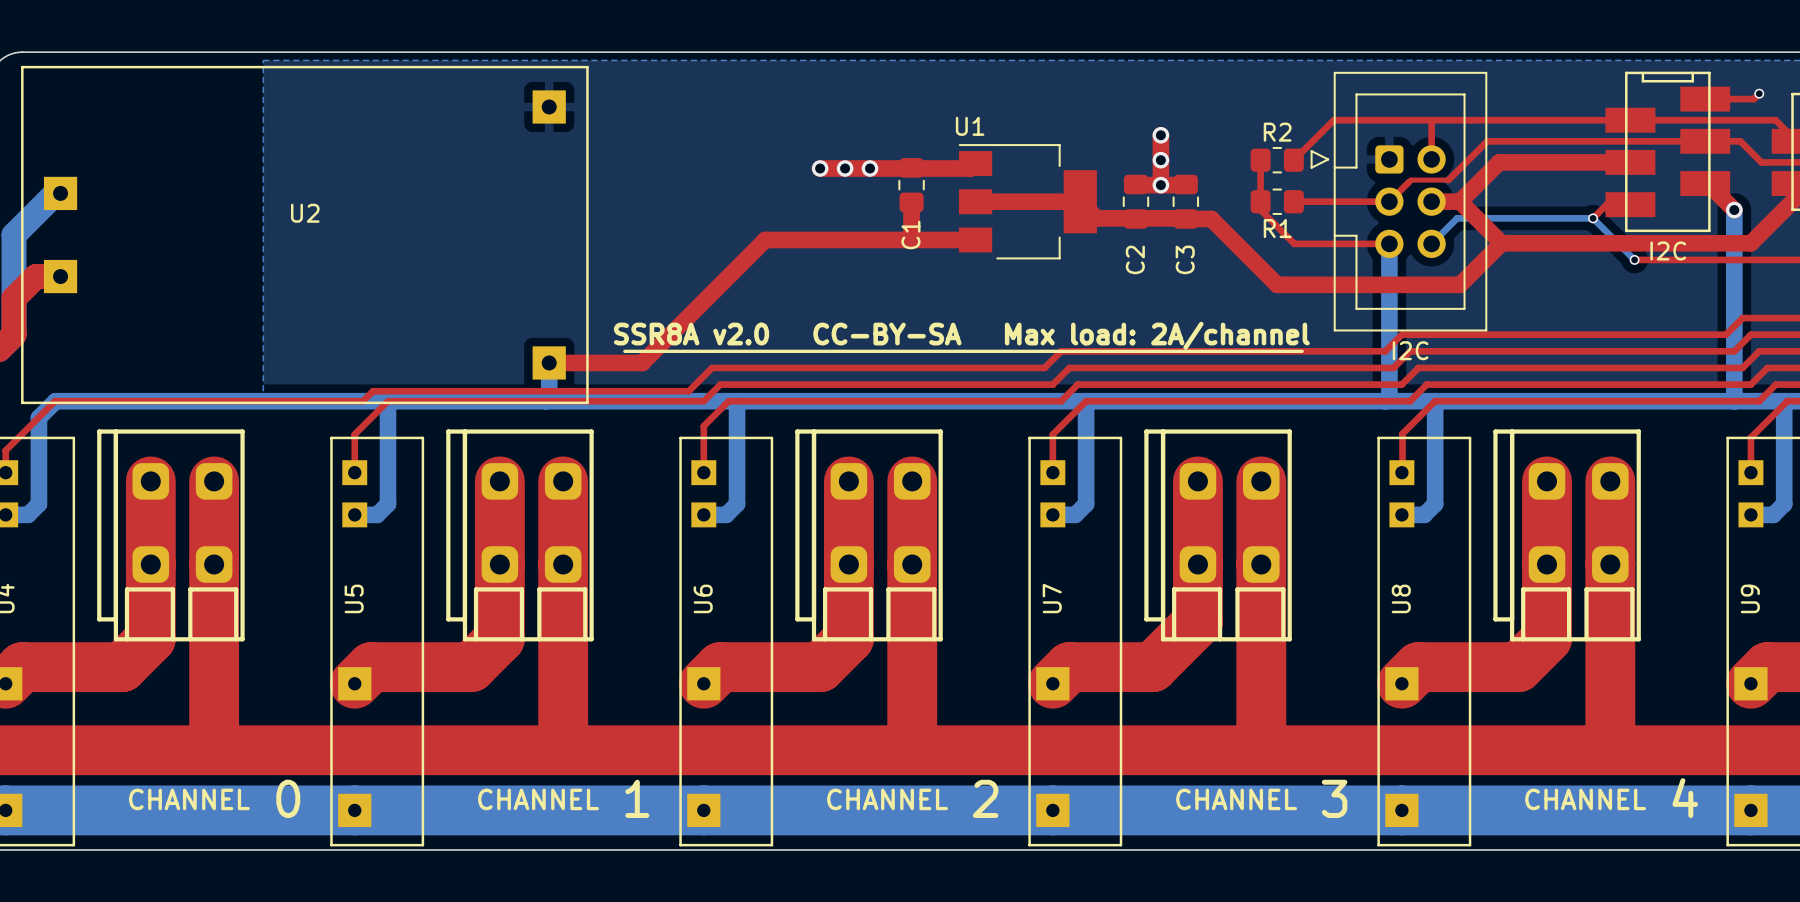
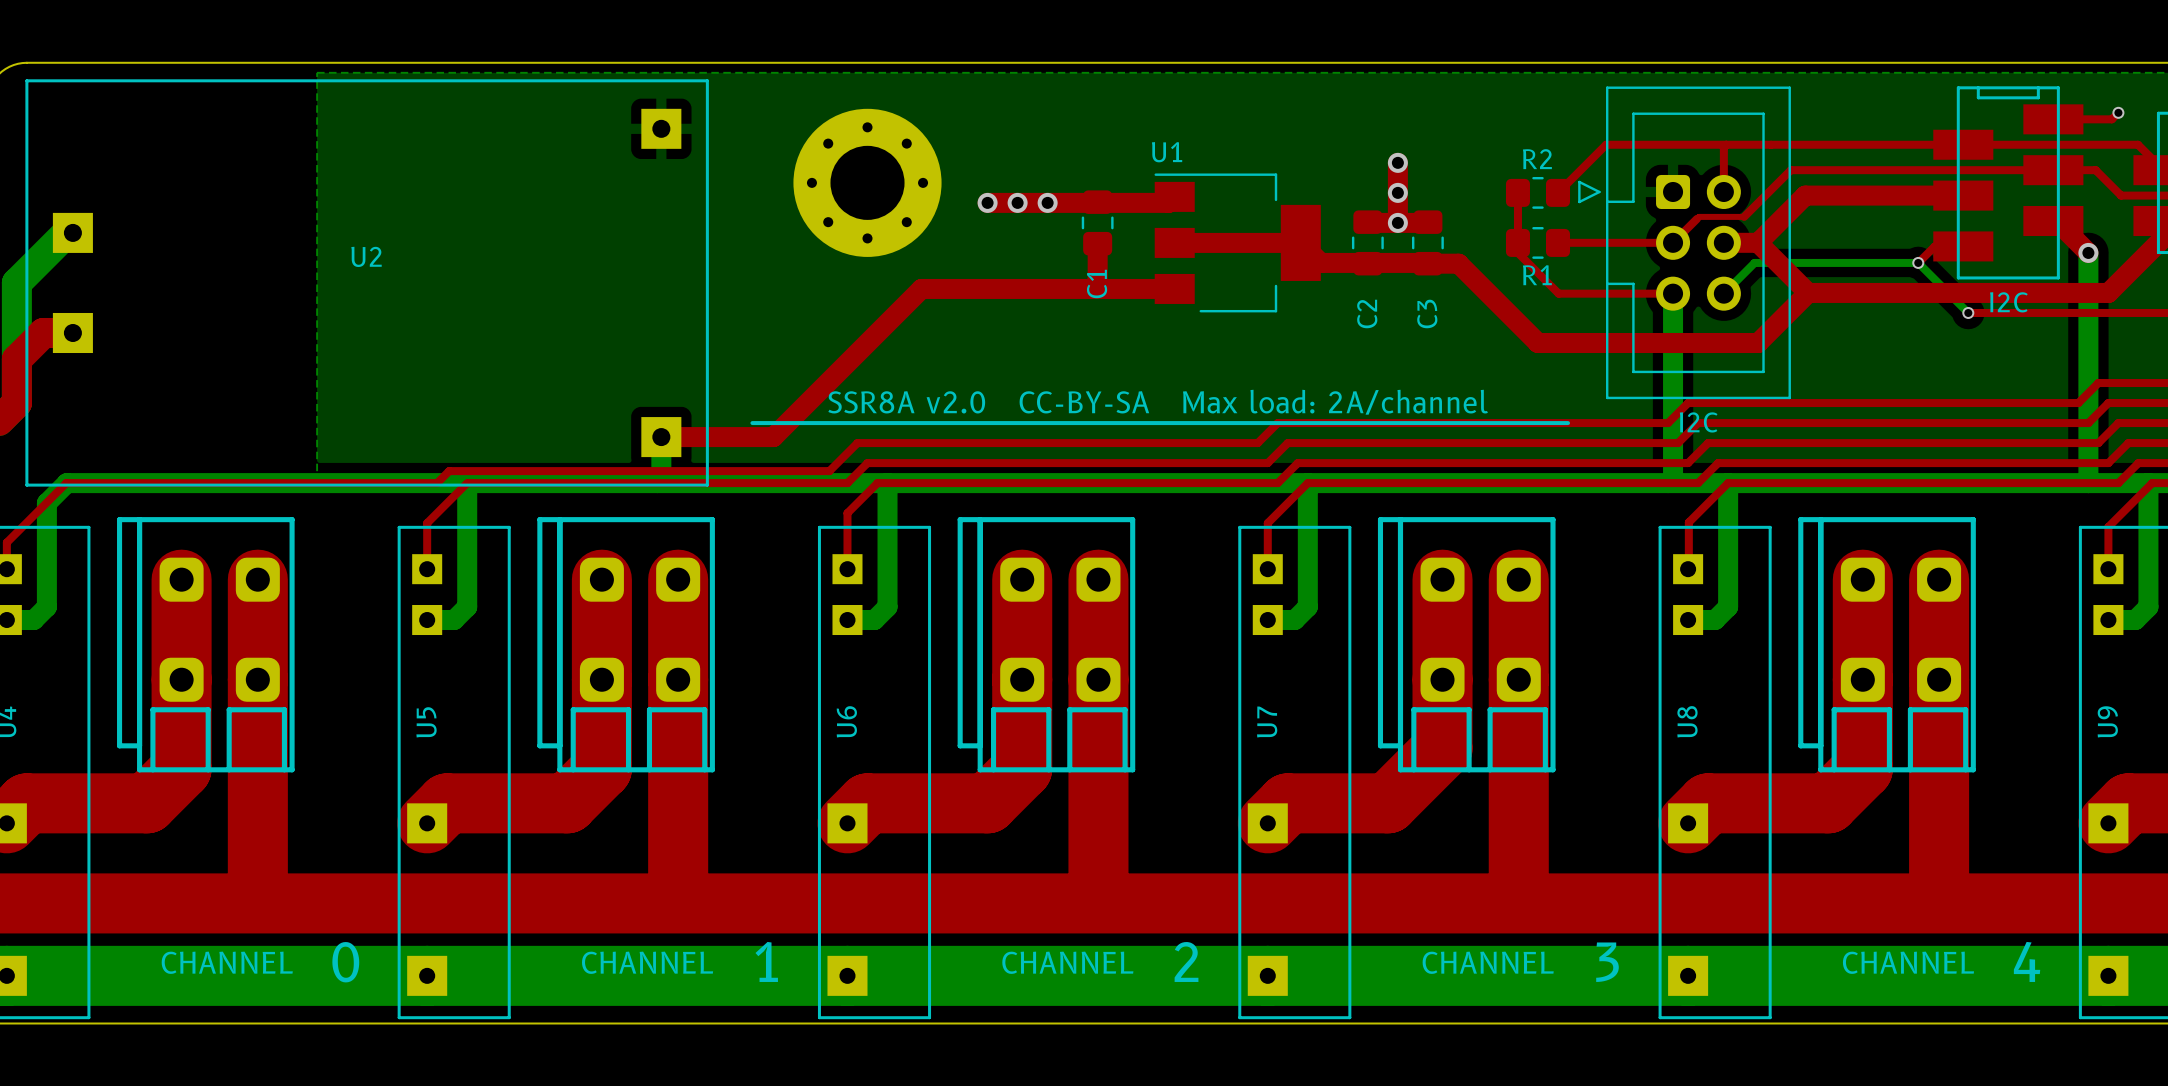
part: none -> (867, 182)

